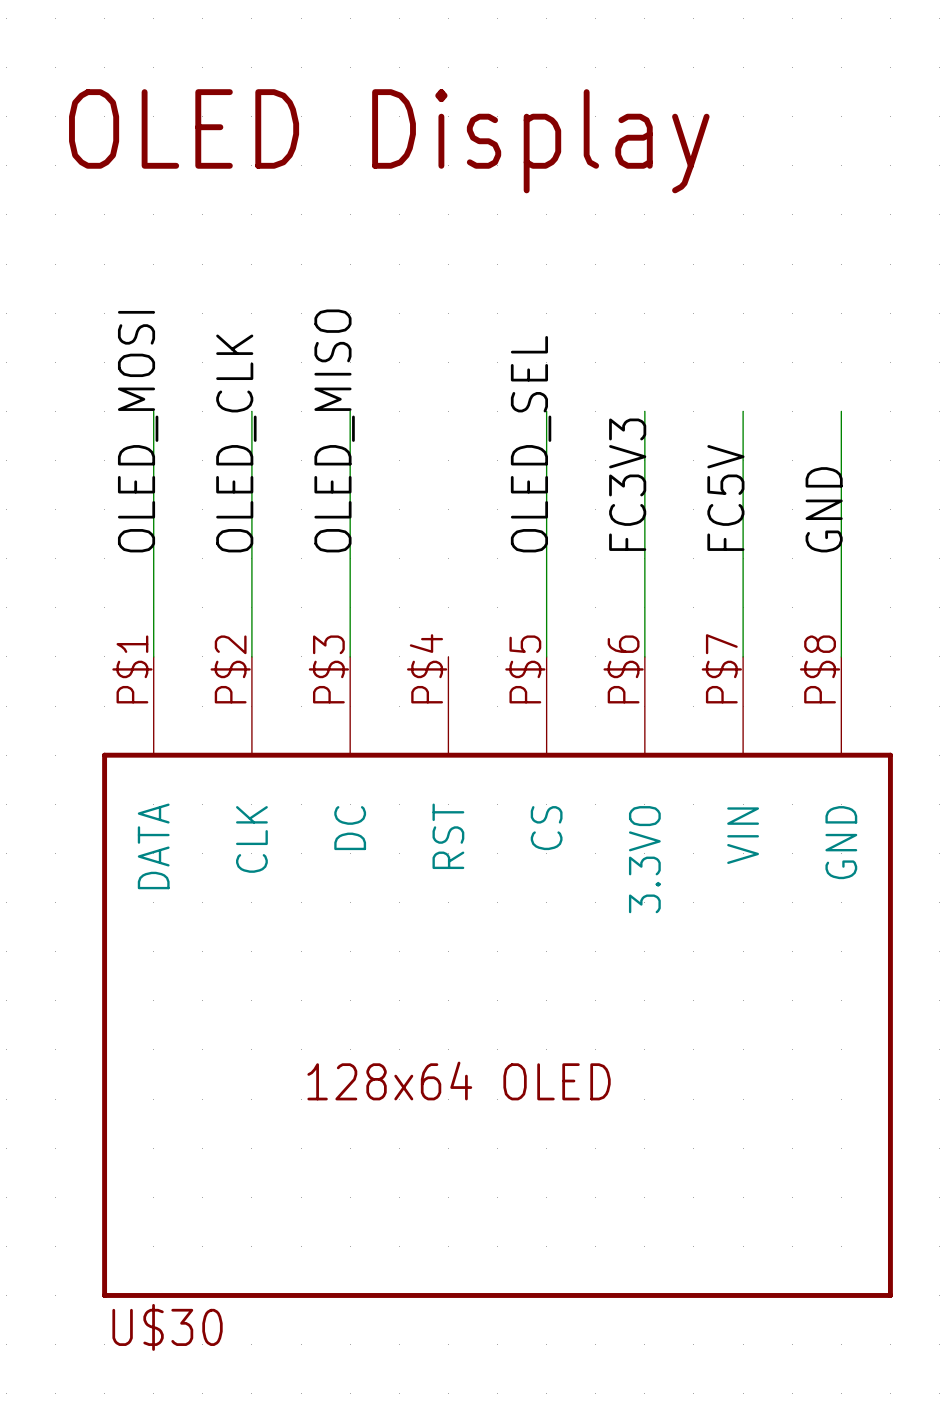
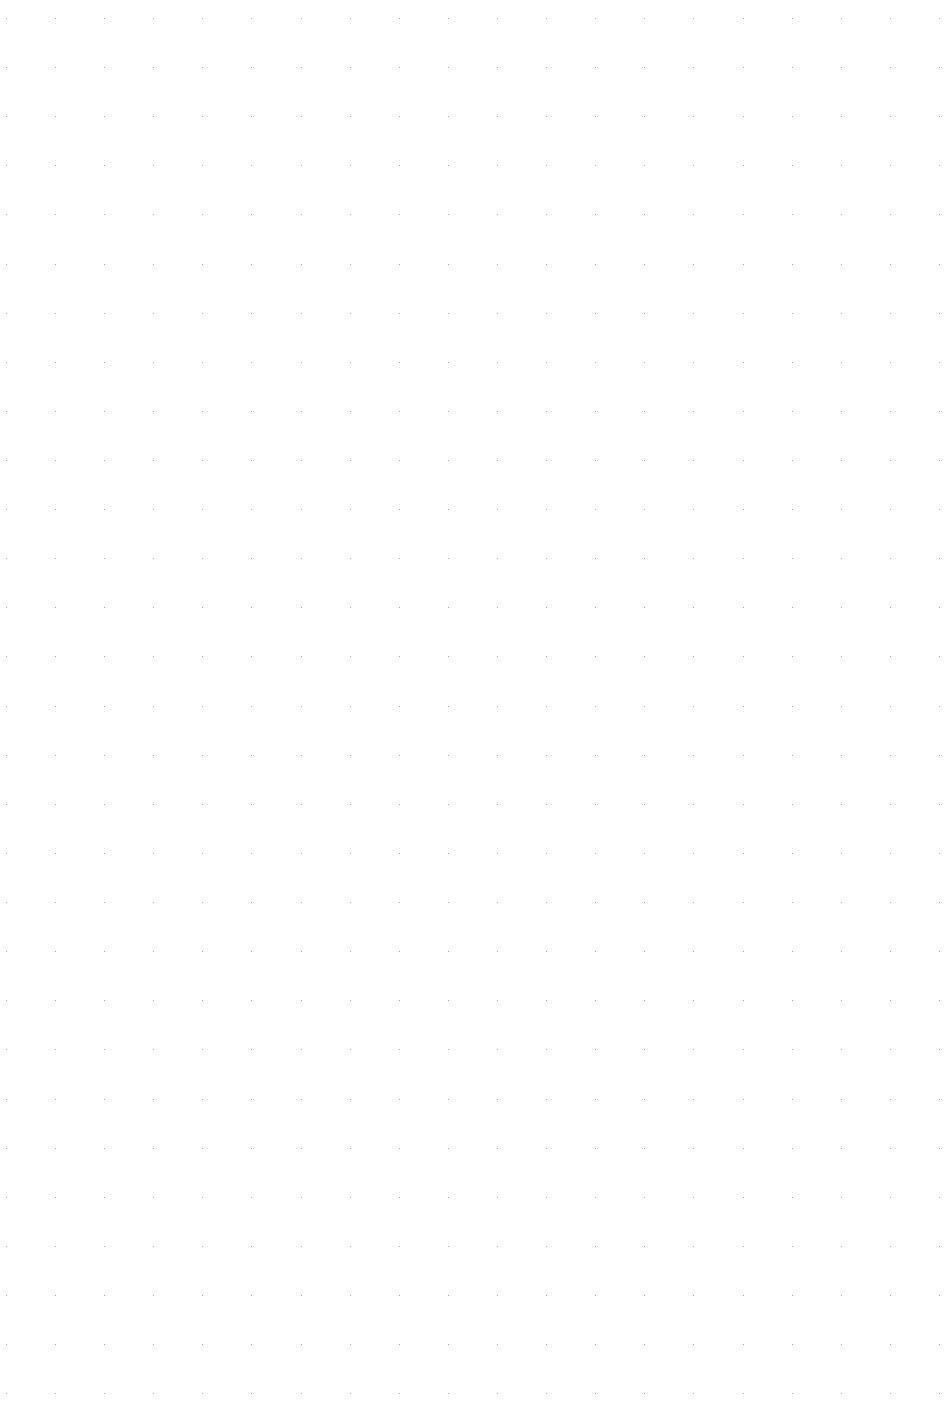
text: OLED Display (389, 141) -> none
wire: (153, 411) (153, 656) -> none
wire: (251, 411) (251, 656) -> none
wire: (350, 411) (350, 656) -> none
wire: (546, 411) (546, 656) -> none
wire: (644, 411) (644, 656) -> none
wire: (743, 411) (743, 656) -> none
wire: (841, 411) (841, 656) -> none
label: OLED_MISO (334, 430) -> none
label: OLED_MOSI (138, 431) -> none
label: OLED_CLK (236, 443) -> none
label: OLED_SEL (531, 444) -> none
label: FC3V3 (627, 484) -> none
label: FC5V (725, 497) -> none
label: GND (824, 509) -> none
U$30: (497, 977) -> none

